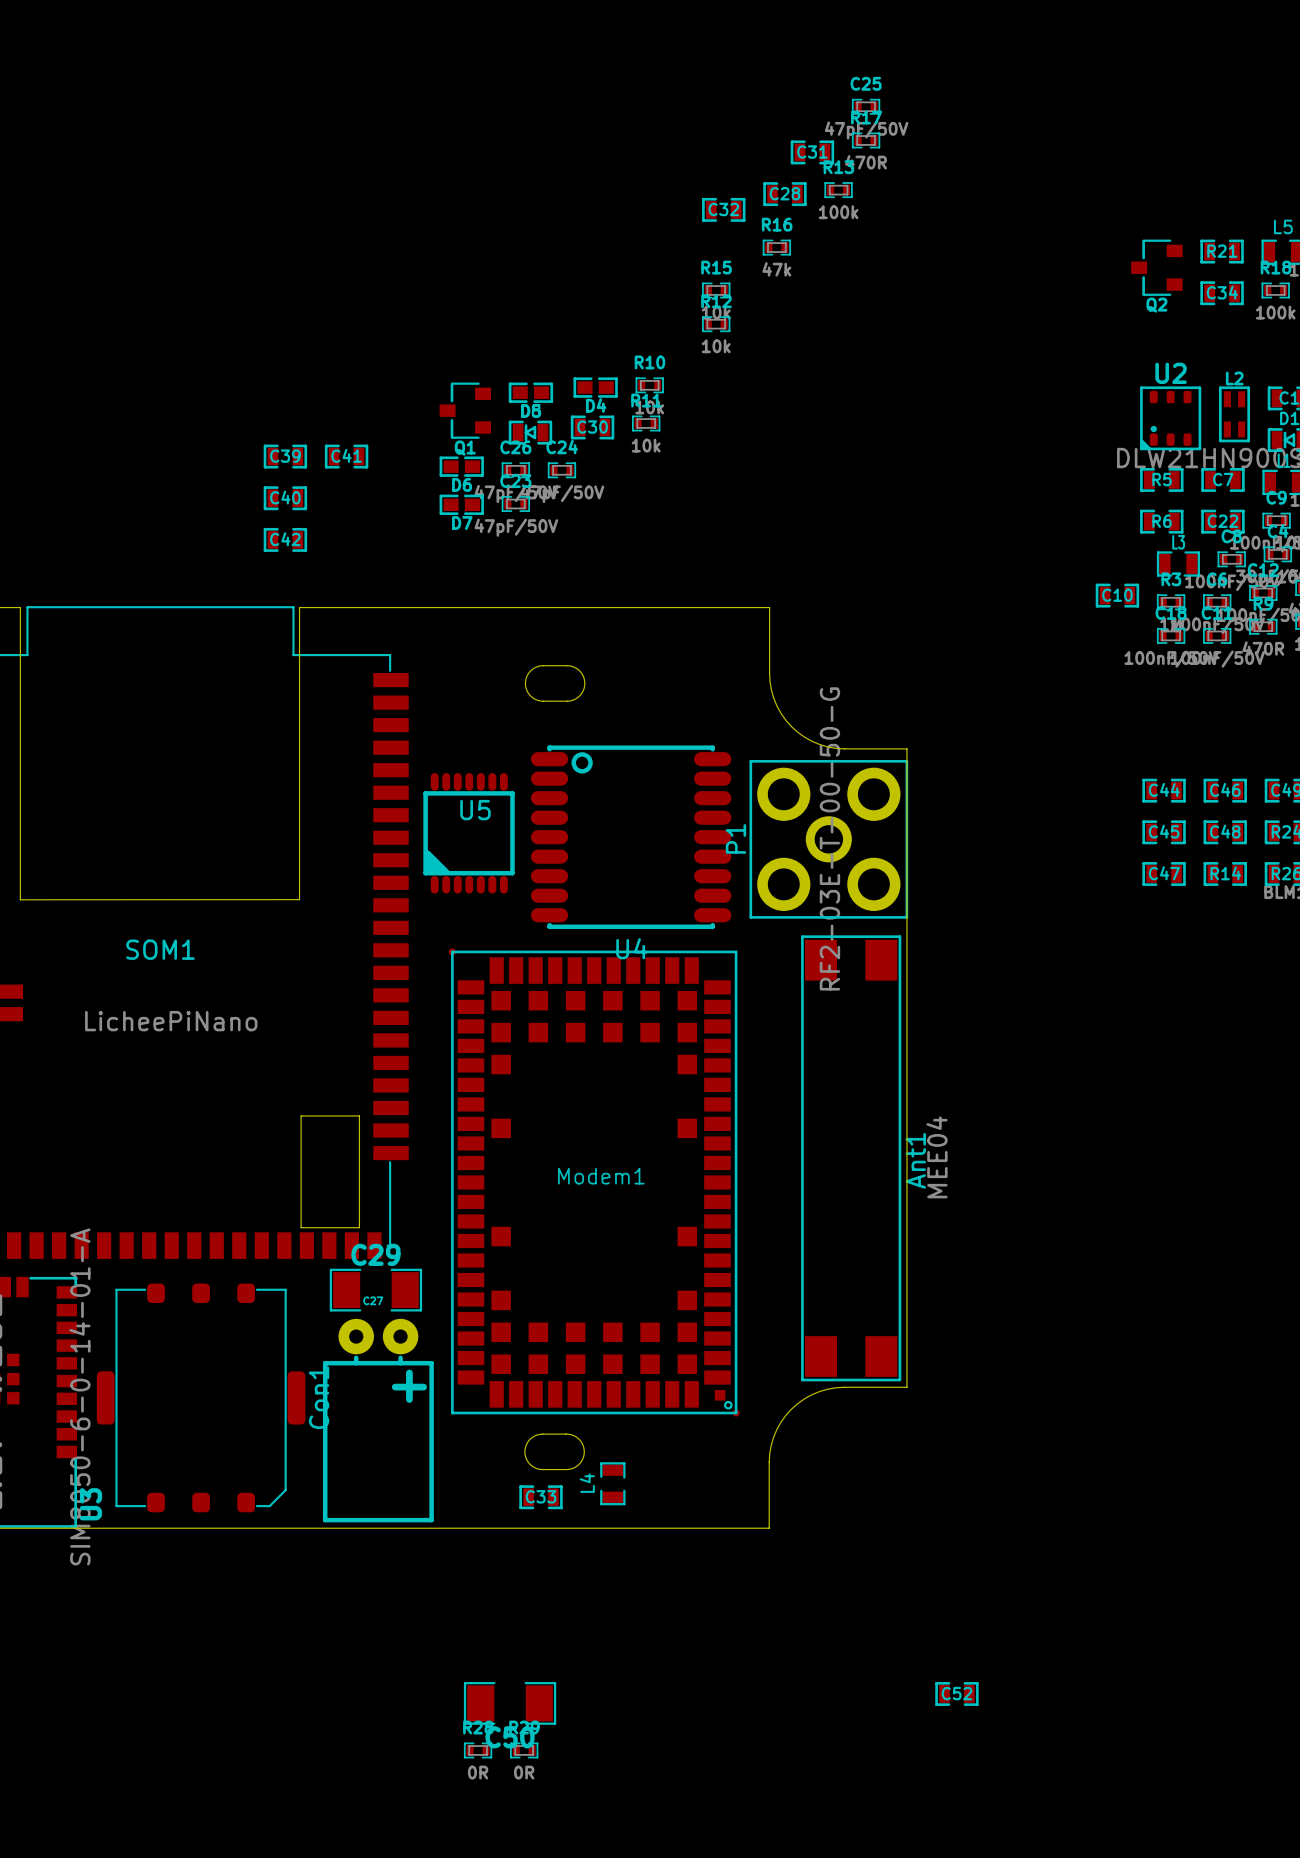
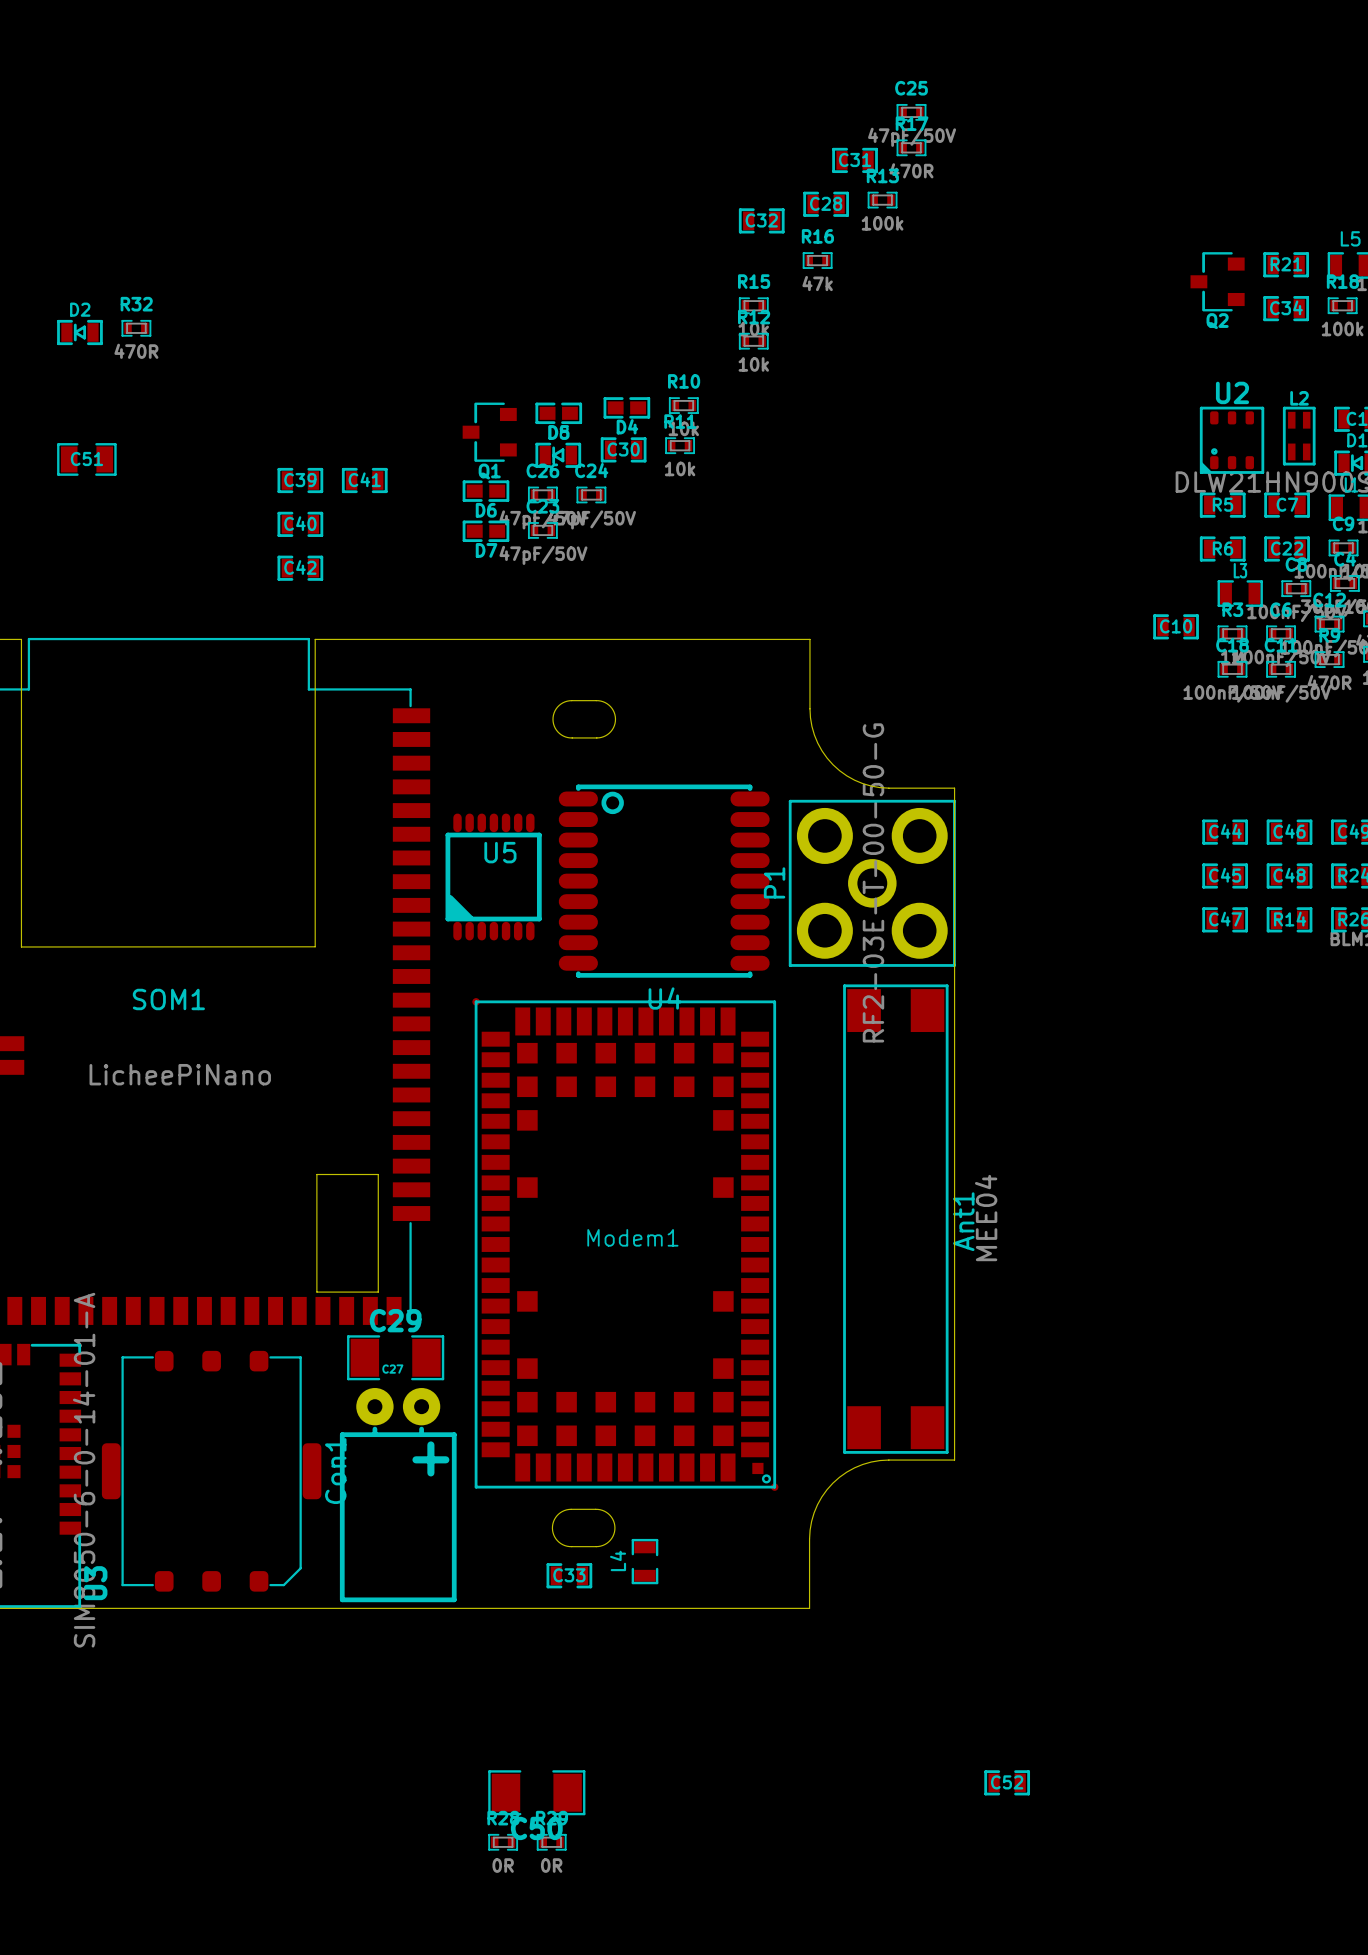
R32: none -> 470R (136, 328)
D2: none -> (79, 332)
C51: none -> (86, 459)

